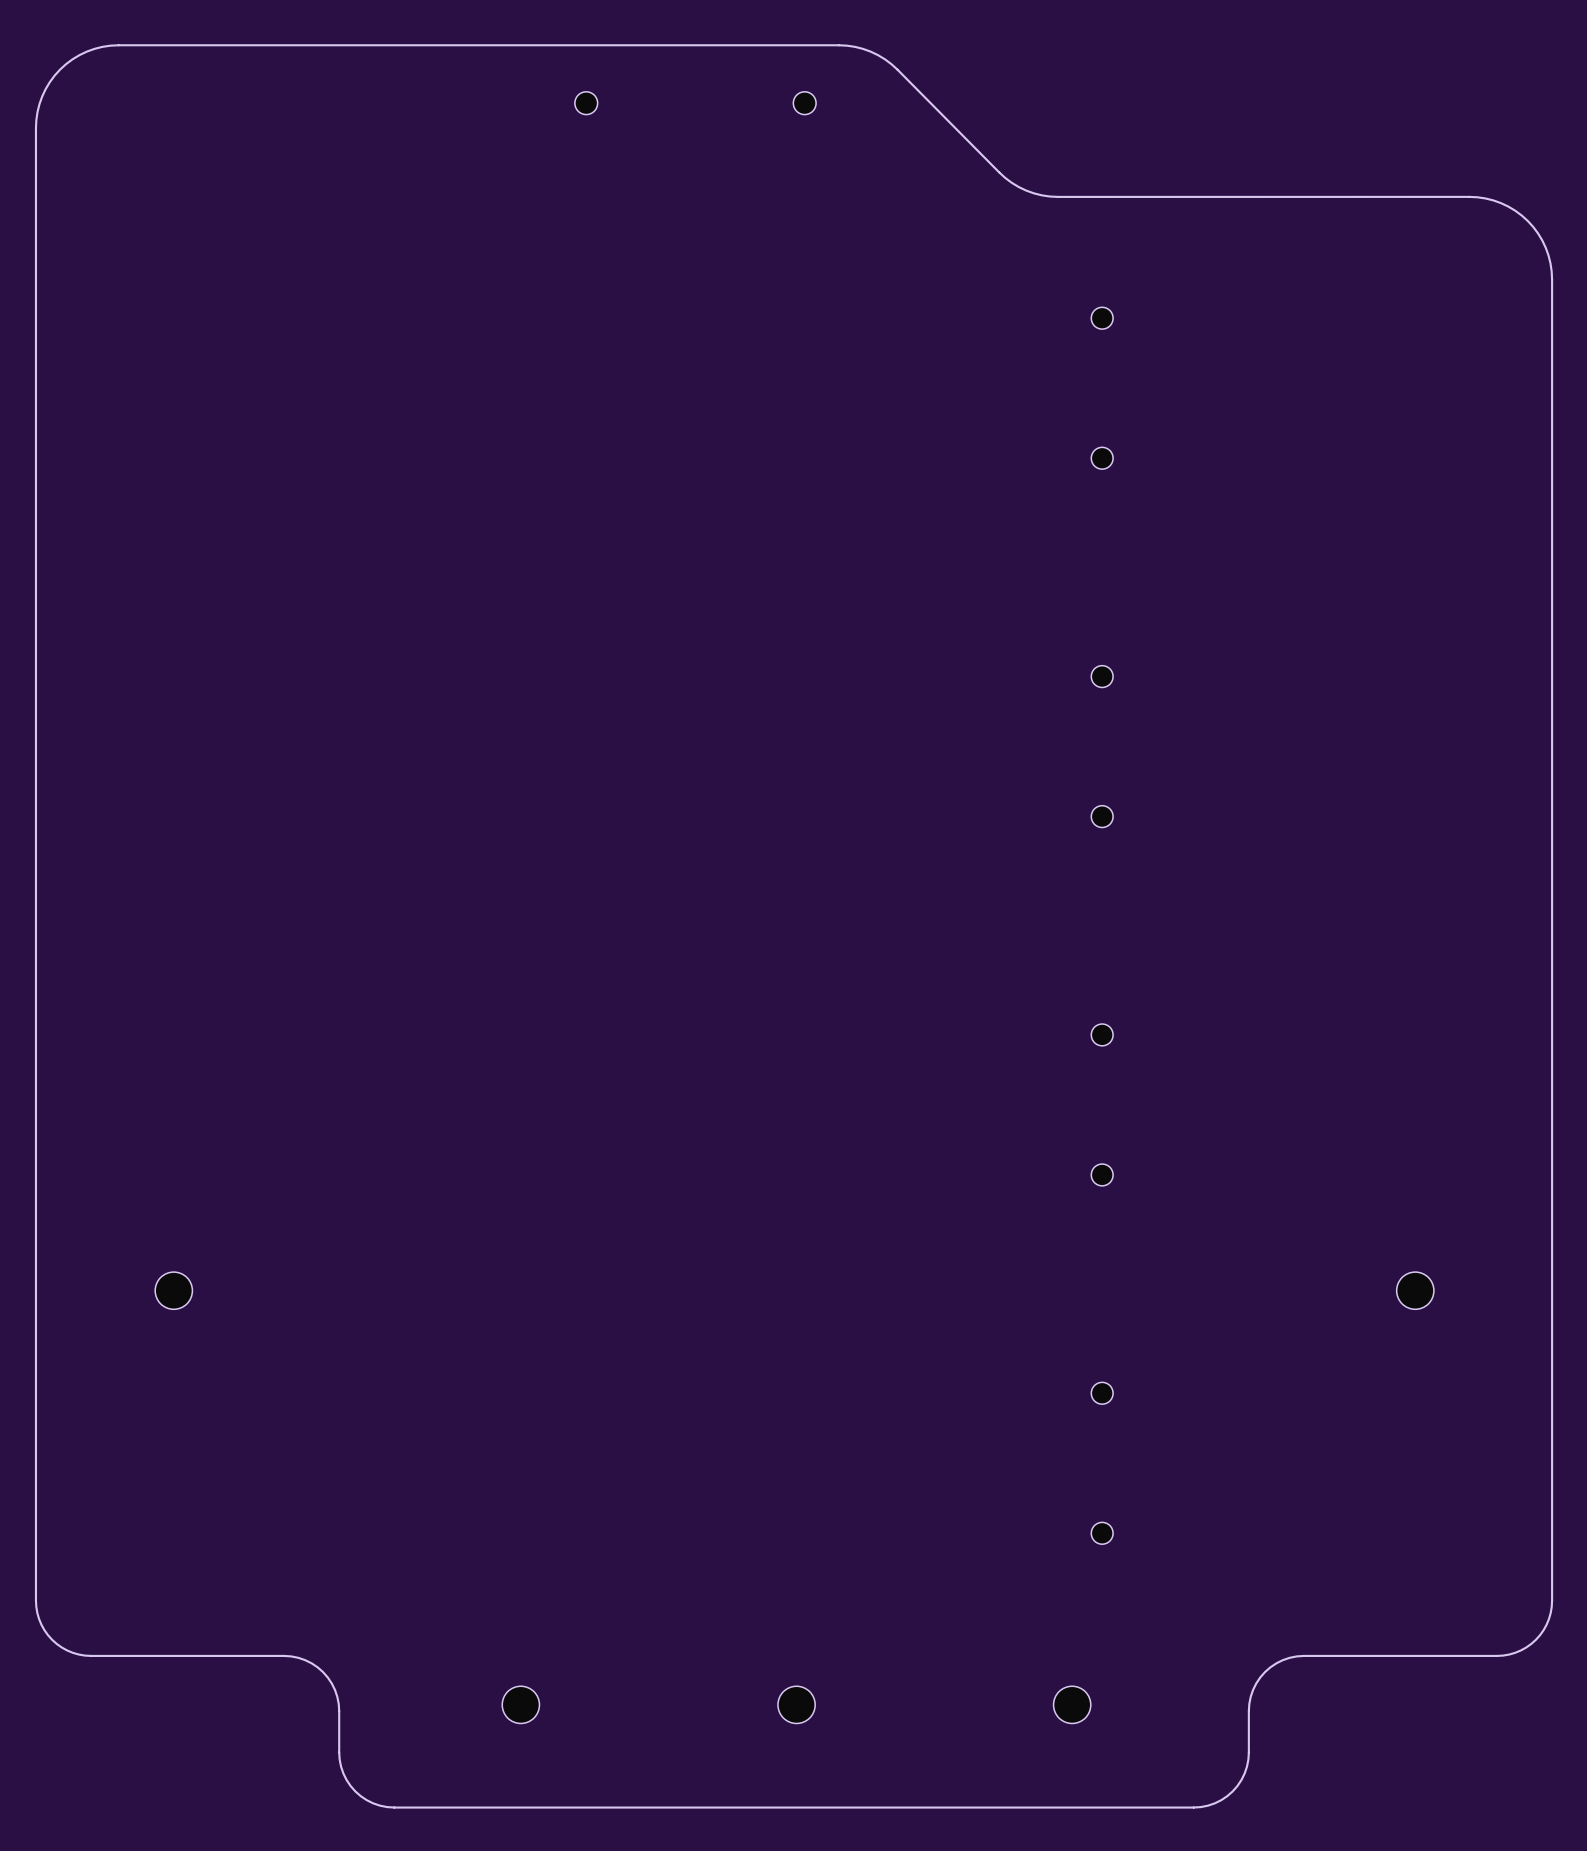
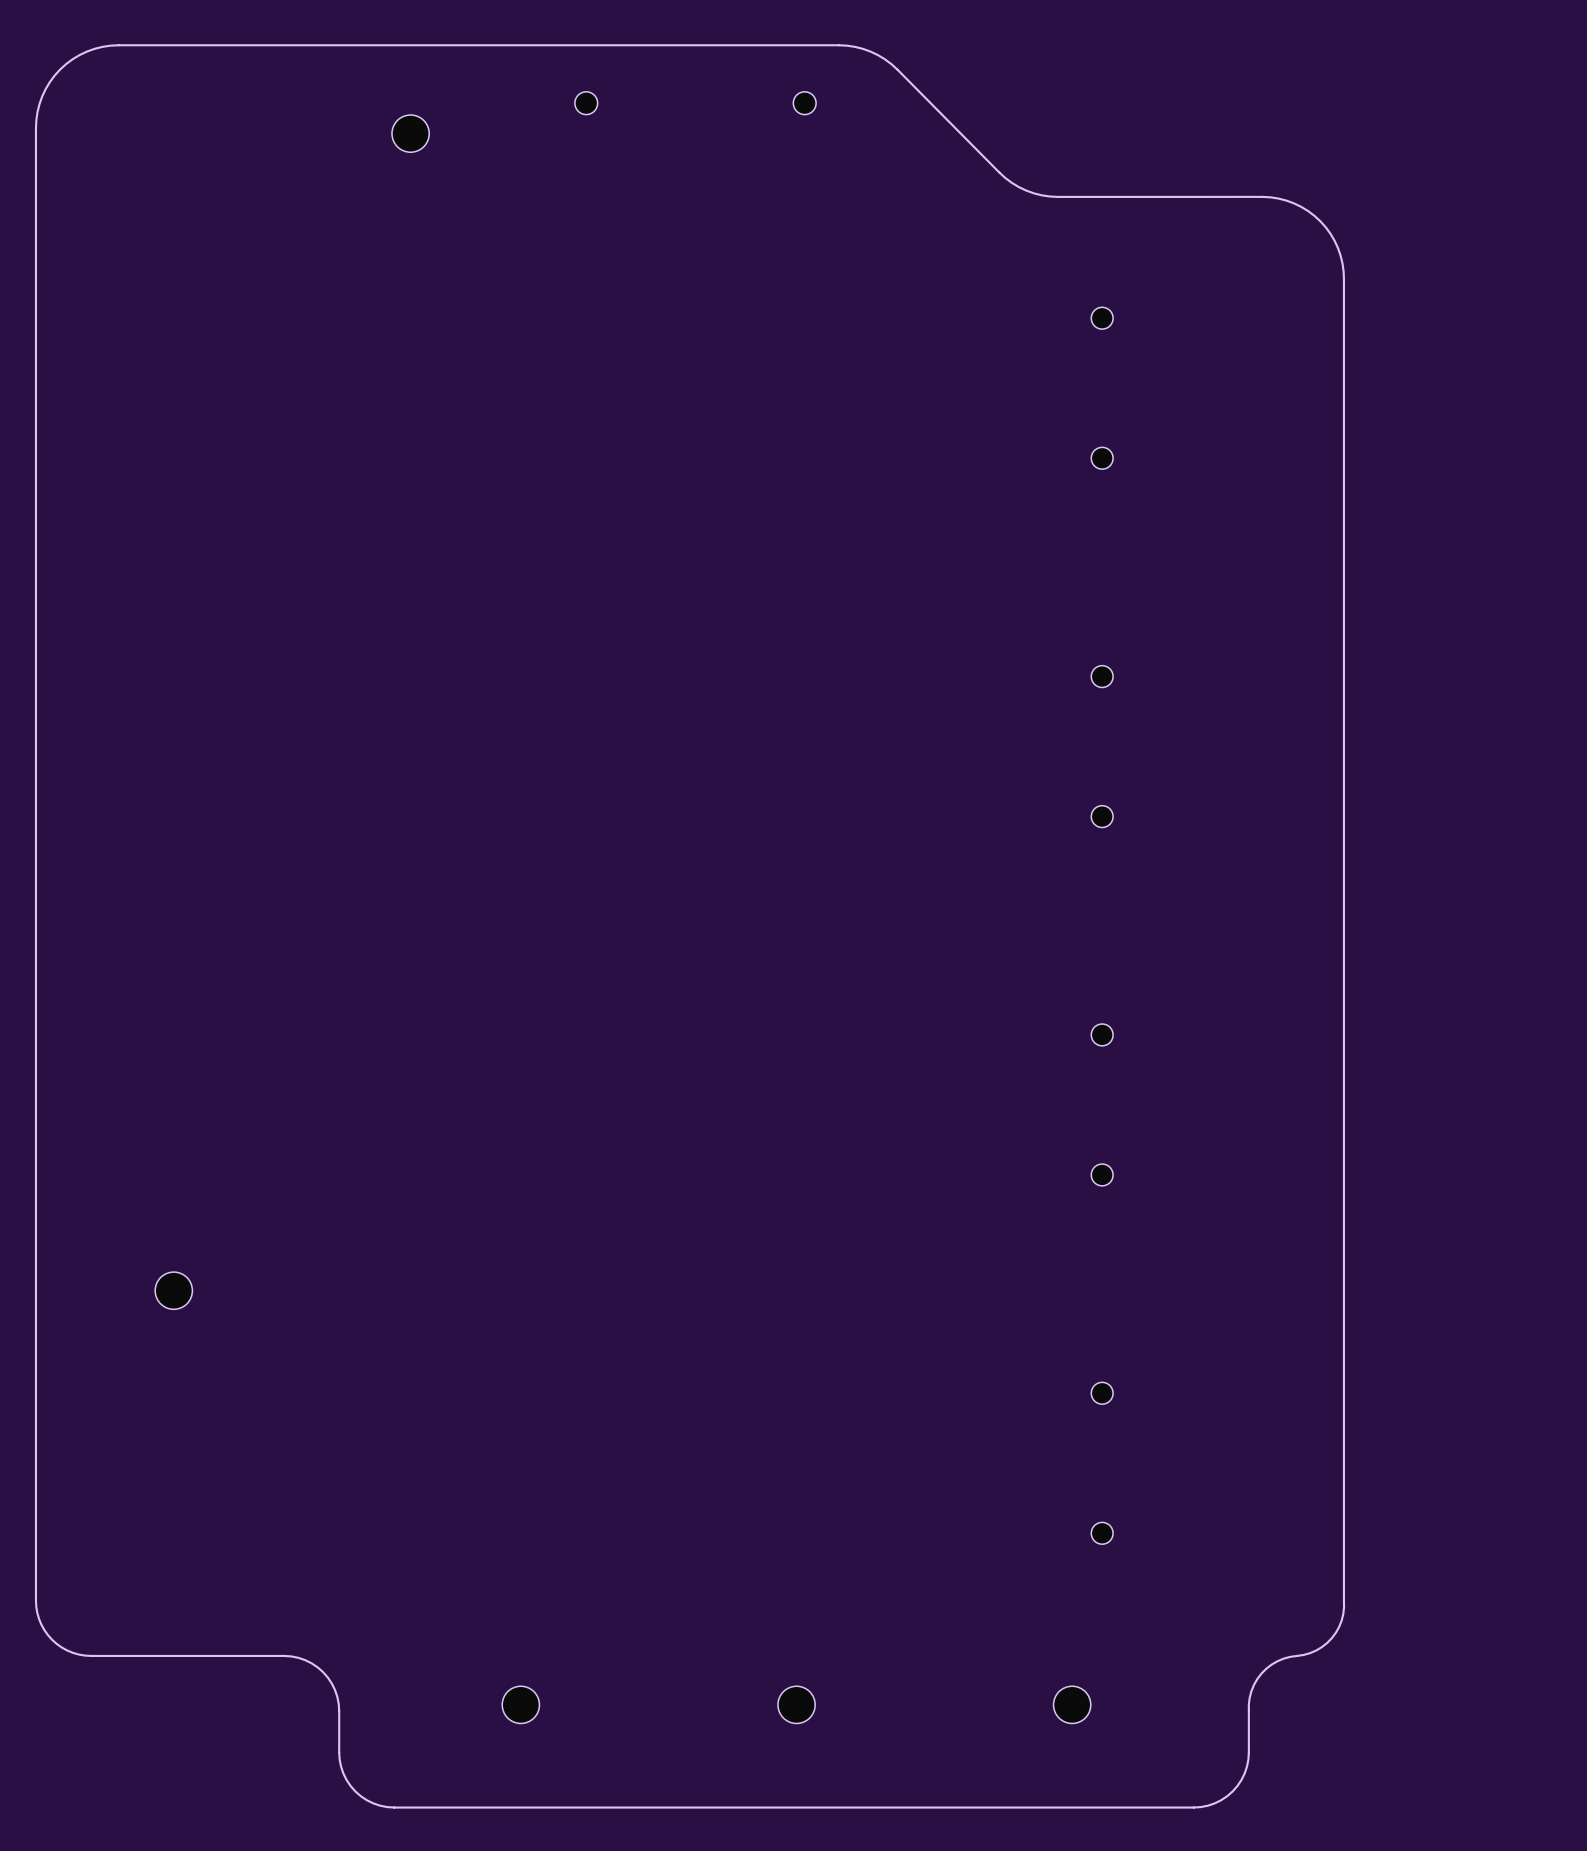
hole: none -> (410, 133)
board edge: (1058, 196) (1469, 196) (1485, 198) (1508, 206) (1521, 215) (1533, 227) (1545, 247) (1551, 271) (1550, 1613) (1546, 1624) (1535, 1639) (1520, 1650) (1509, 1654) (1303, 1655) (1289, 1657) (1276, 1663) (1260, 1677) (1250, 1696) (1248, 1711) -> (1058, 196) (1262, 196) (1286, 200) (1308, 211) (1325, 227) (1338, 248) (1343, 271) (1344, 1607) (1339, 1626) (1327, 1642) (1310, 1653) (1277, 1661) (1261, 1673) (1251, 1691) (1248, 1711)
hole: (1415, 1290) -> none

